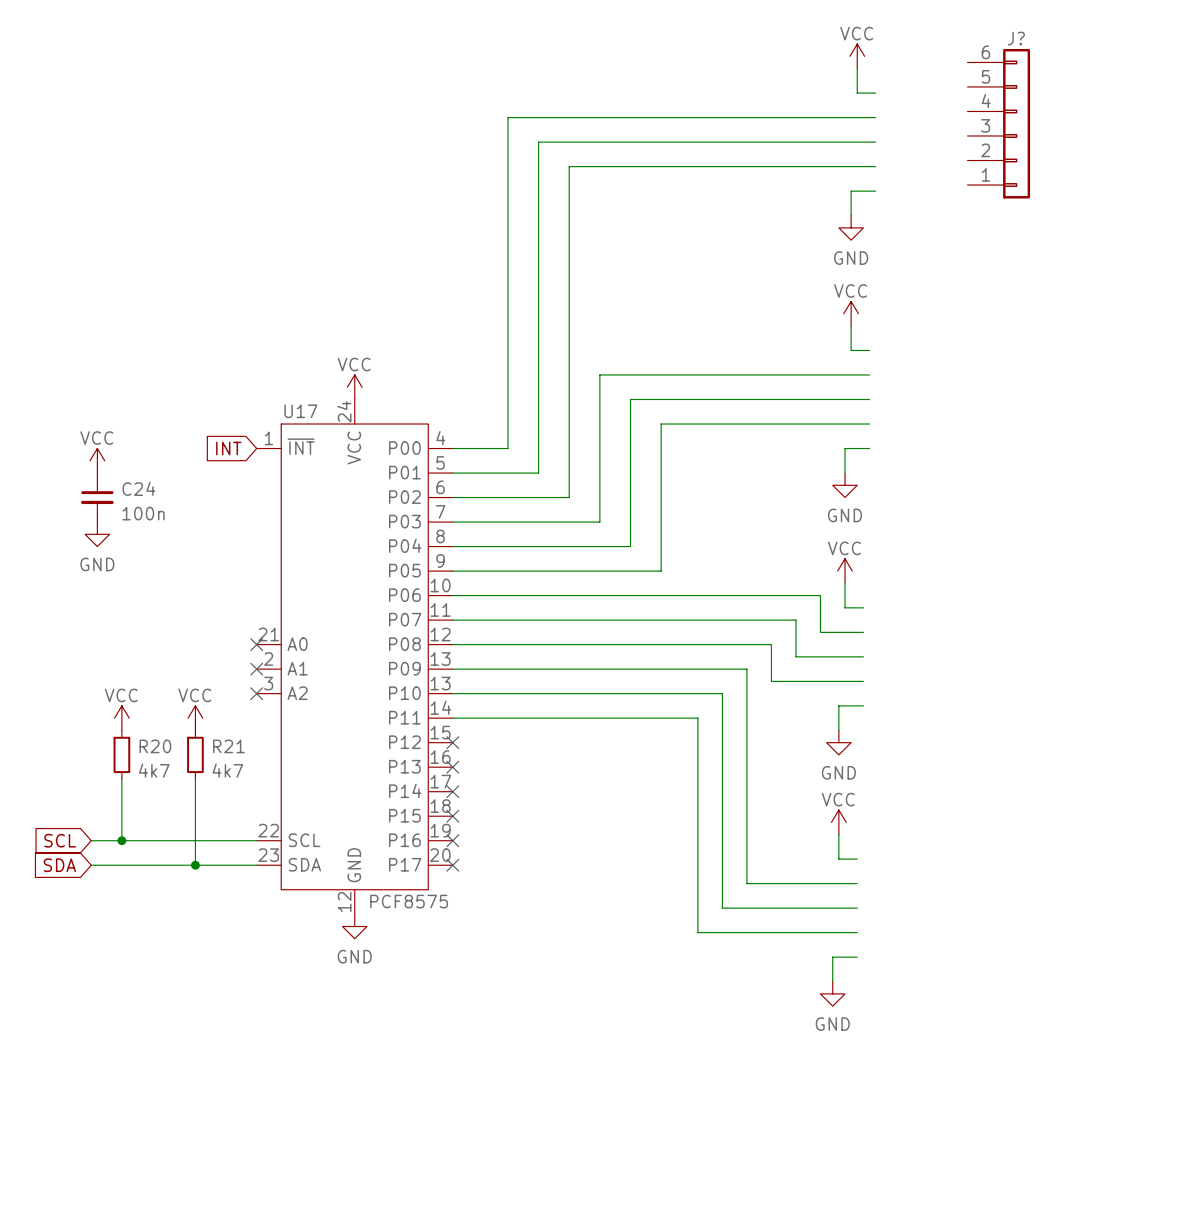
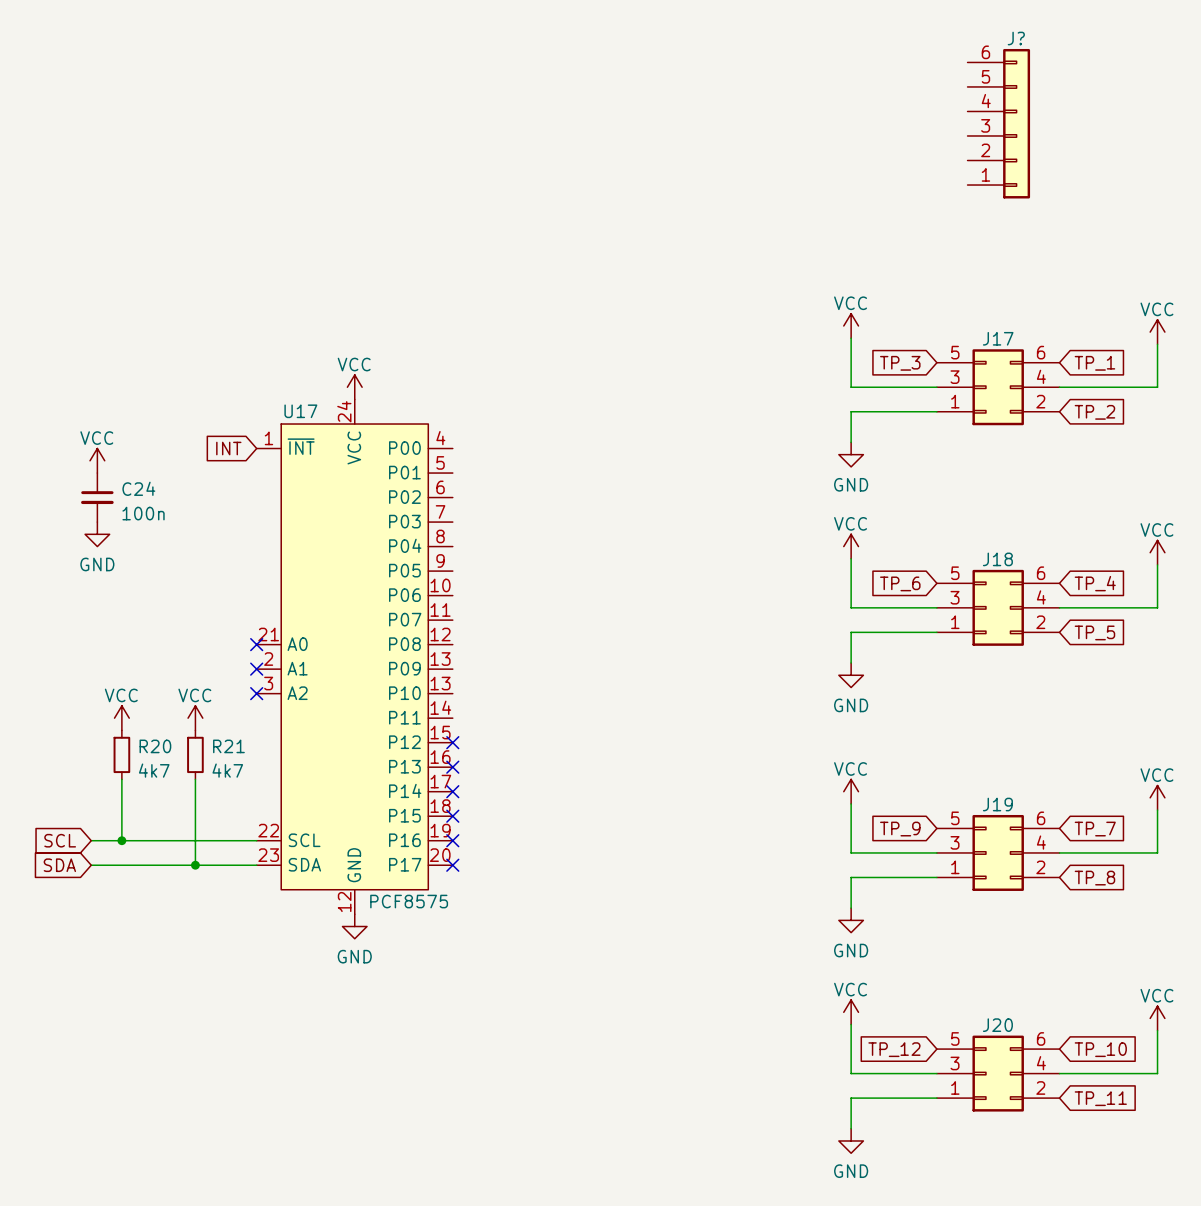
power symbol: VCC (857, 56) -> none
wire: (857, 68) (857, 93) (875, 93) -> none
wire: (875, 117) (507, 117) (507, 448) (452, 448) -> none
wire: (875, 142) (538, 142) (538, 473) (452, 473) -> none
wire: (875, 166) (569, 166) (569, 497) (452, 497) -> none
wire: (875, 191) (851, 191) (851, 215) -> none
power symbol: GND (851, 227) -> none
power symbol position: VCC (851, 313) -> VCC (851, 325)
power symbol: none -> VCC (1157, 332)
wire: none -> (1157, 344) (1157, 387) (1059, 387)
wire: (851, 350) (869, 350) -> (851, 350) (851, 387) (936, 387)
global label: none -> TP_3 (900, 363)
global label: none -> TP_1 (1094, 363)
wire: (869, 374) (599, 374) (599, 522) (452, 522) -> none
J17: none -> (998, 387)
wire: (869, 399) (630, 399) (630, 546) (452, 546) -> none
wire: none -> (936, 411) (851, 411) (851, 442)
global label: none -> TP_2 (1094, 412)
wire: (869, 424) (661, 424) (661, 571) (452, 571) -> none
wire: (869, 448) (845, 448) (845, 473) -> none
power symbol position: GND (845, 485) -> GND (851, 454)
power symbol: none -> VCC (1157, 552)
wire: none -> (1157, 564) (1157, 607) (1059, 607)
power symbol position: VCC (845, 571) -> VCC (851, 546)
wire: (845, 583) (845, 607) (851, 607) -> (851, 558) (851, 607)
global label: none -> TP_6 (900, 583)
global label: none -> TP_4 (1095, 583)
wire: (452, 595) (820, 595) (820, 632) (851, 632) -> (851, 663) (851, 632)
wire: none -> (863, 607) (936, 607)
J18: none -> (998, 607)
wire: (452, 620) (795, 620) (795, 656) (863, 656) -> none
wire: none -> (863, 632) (936, 632)
global label: none -> TP_5 (1094, 632)
wire: (452, 644) (771, 644) (771, 681) (863, 681) -> none
wire: (452, 669) (746, 669) (746, 883) (857, 883) -> none
wire: (452, 693) (722, 693) (722, 908) (857, 908) -> none
wire: (863, 705) (838, 705) (838, 730) -> none
wire: (452, 718) (697, 718) (697, 932) (857, 932) -> none
power symbol position: GND (838, 742) -> GND (851, 675)
power symbol: none -> VCC (1157, 797)
wire: none -> (851, 803) (851, 852) (936, 852)
wire: none -> (1157, 810) (1157, 852) (1059, 852)
power symbol position: VCC (838, 822) -> VCC (851, 791)
global label: none -> TP_9 (900, 829)
global label: none -> TP_7 (1095, 829)
wire: (838, 834) (838, 859) (857, 859) -> none
J19: none -> (998, 852)
wire: none -> (936, 877) (851, 877) (851, 908)
global label: none -> TP_8 (1094, 878)
power symbol: none -> GND (851, 920)
wire: (857, 957) (832, 957) (832, 981) -> none
power symbol: GND (832, 993) -> none
power symbol: none -> VCC (851, 1012)
power symbol: none -> VCC (1157, 1018)
wire: none -> (851, 1024) (851, 1073) (936, 1073)
wire: none -> (1157, 1030) (1157, 1073) (1059, 1073)
global label: none -> TP_12 (894, 1049)
global label: none -> TP_10 (1100, 1049)
J20: none -> (998, 1073)
wire: none -> (936, 1098) (851, 1098) (851, 1128)
global label: none -> TP_11 (1100, 1098)
power symbol: none -> GND (851, 1140)

